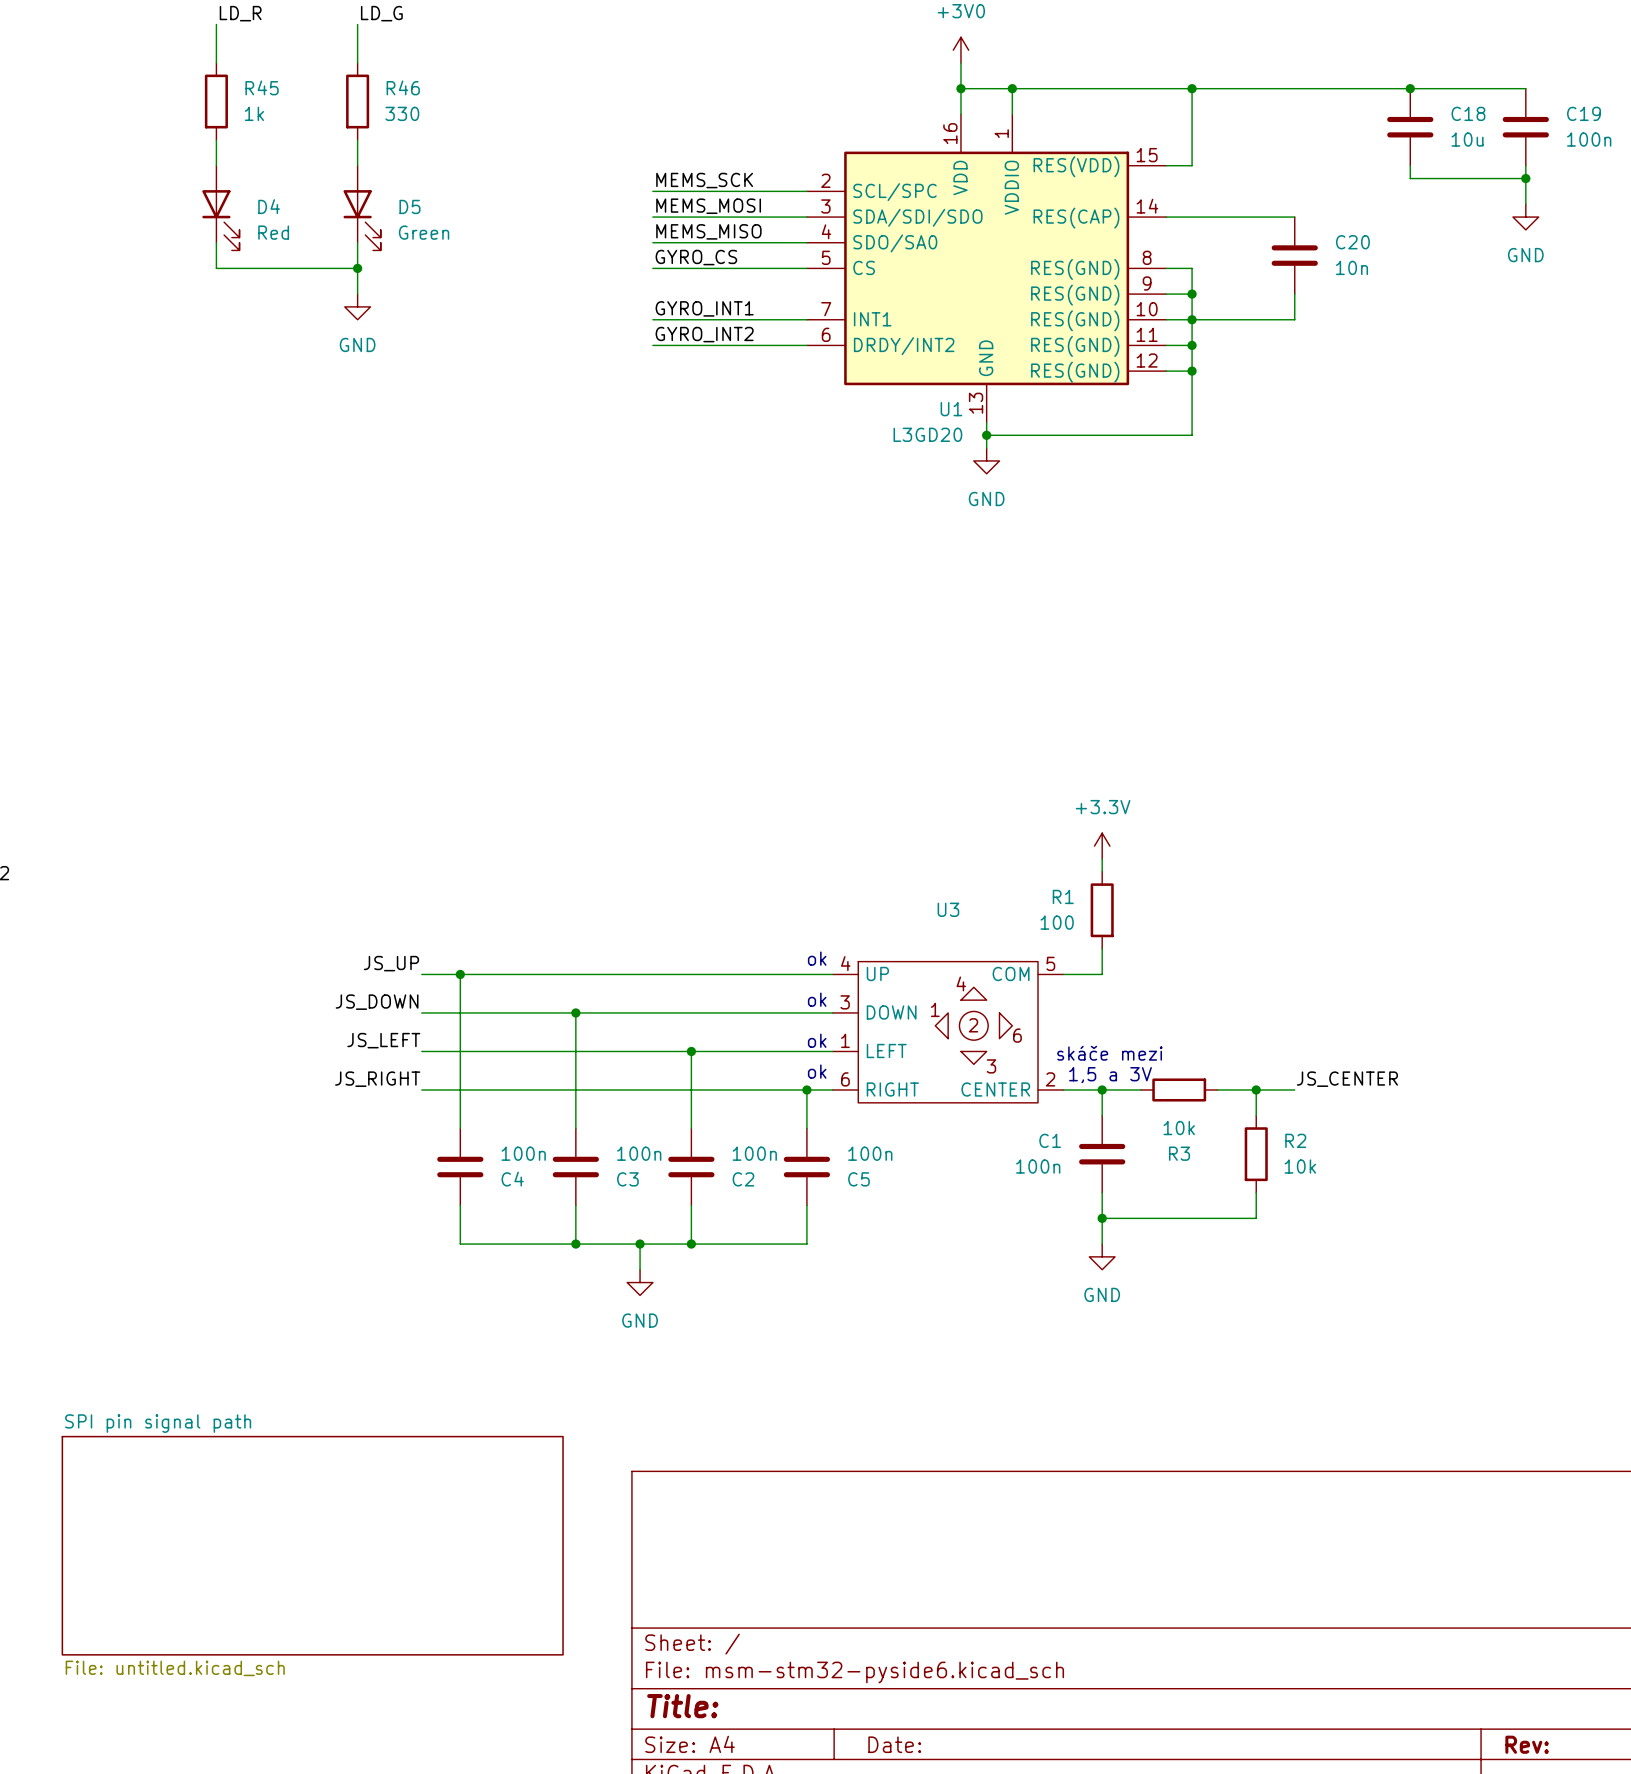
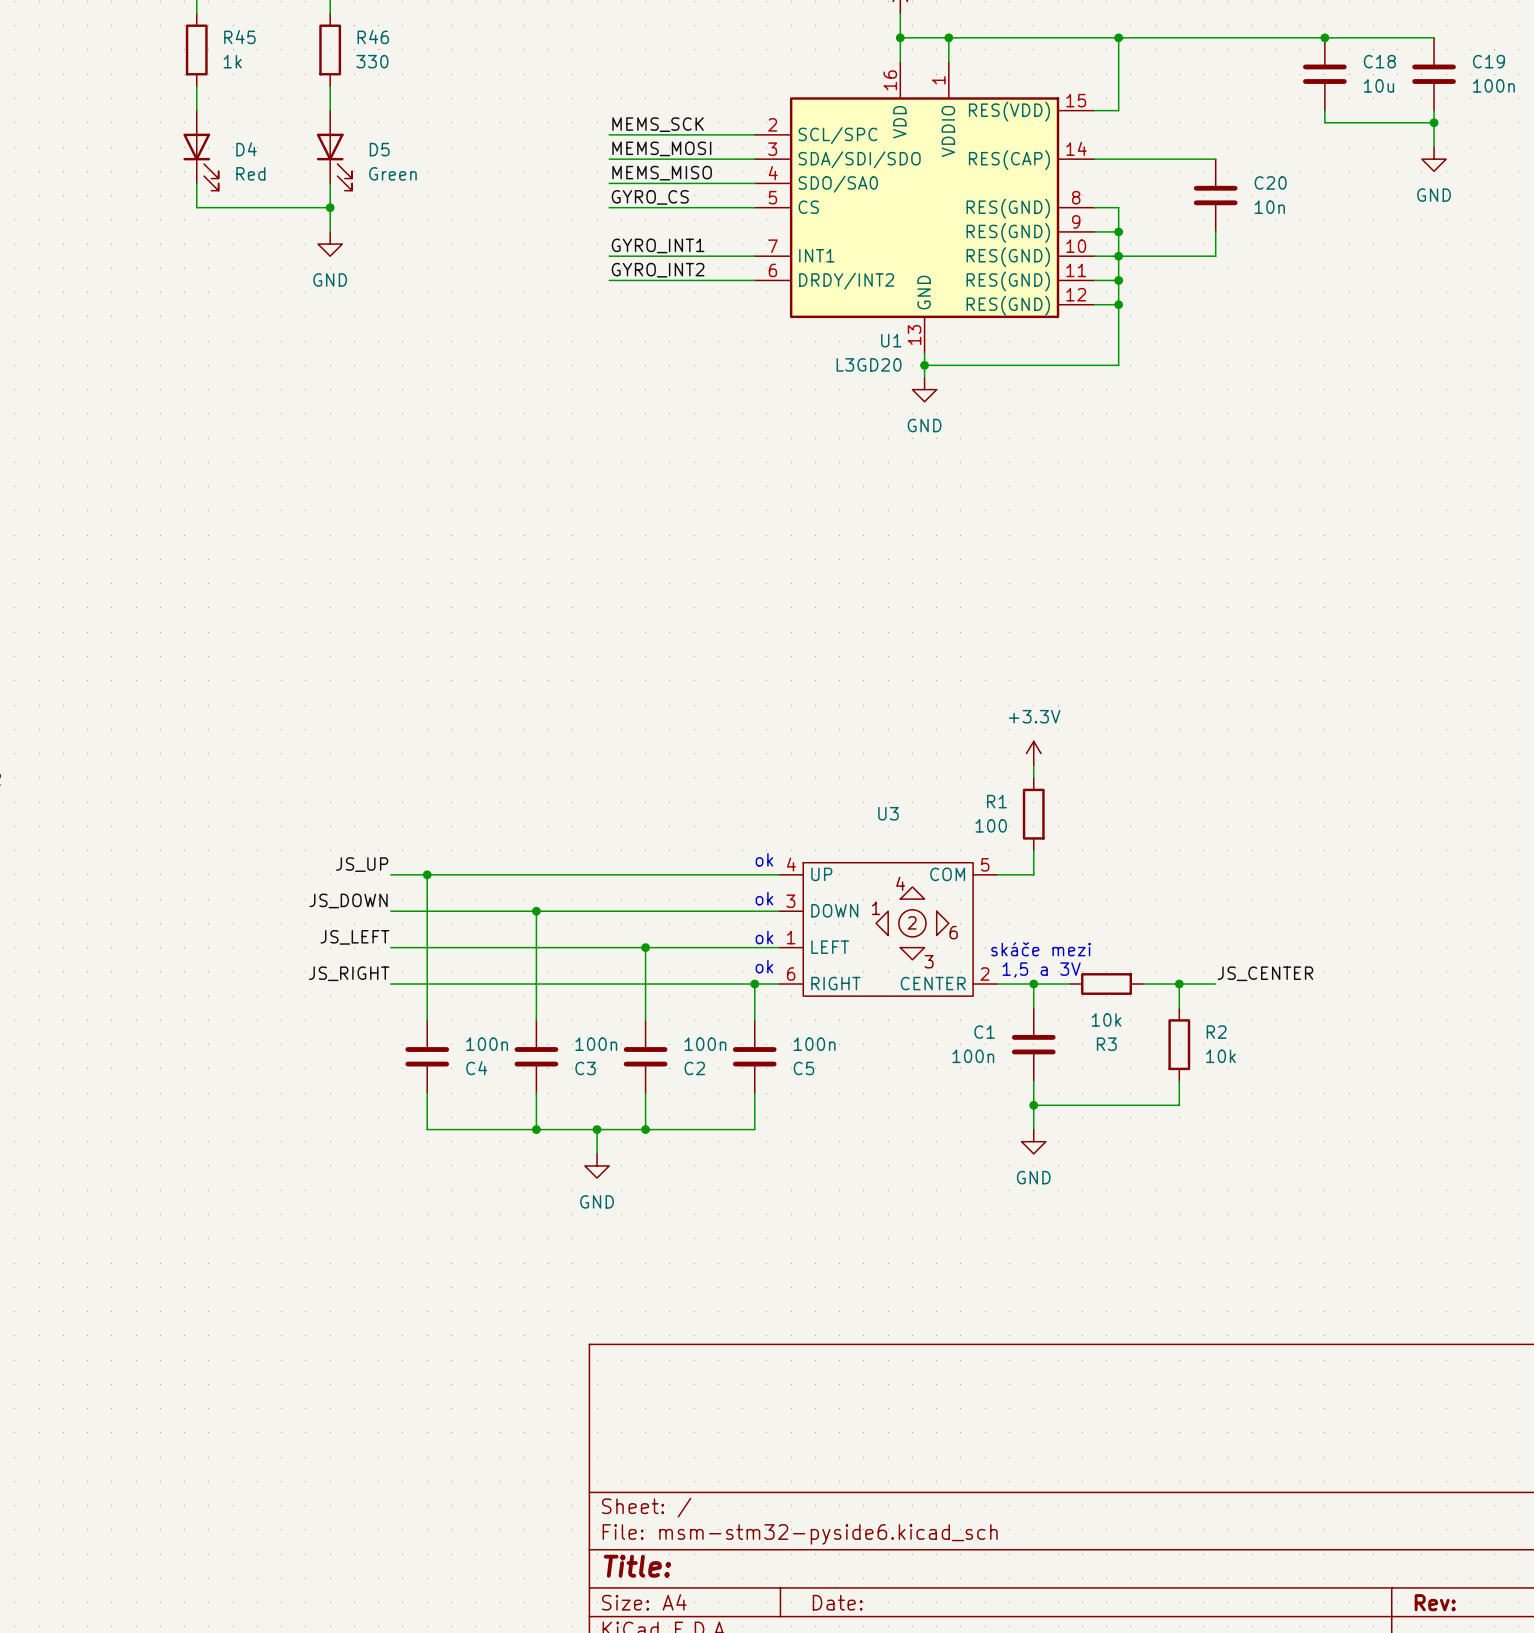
sheet SPI pin signal path: File: untitled.kicad_sch (312, 1545) -> none

